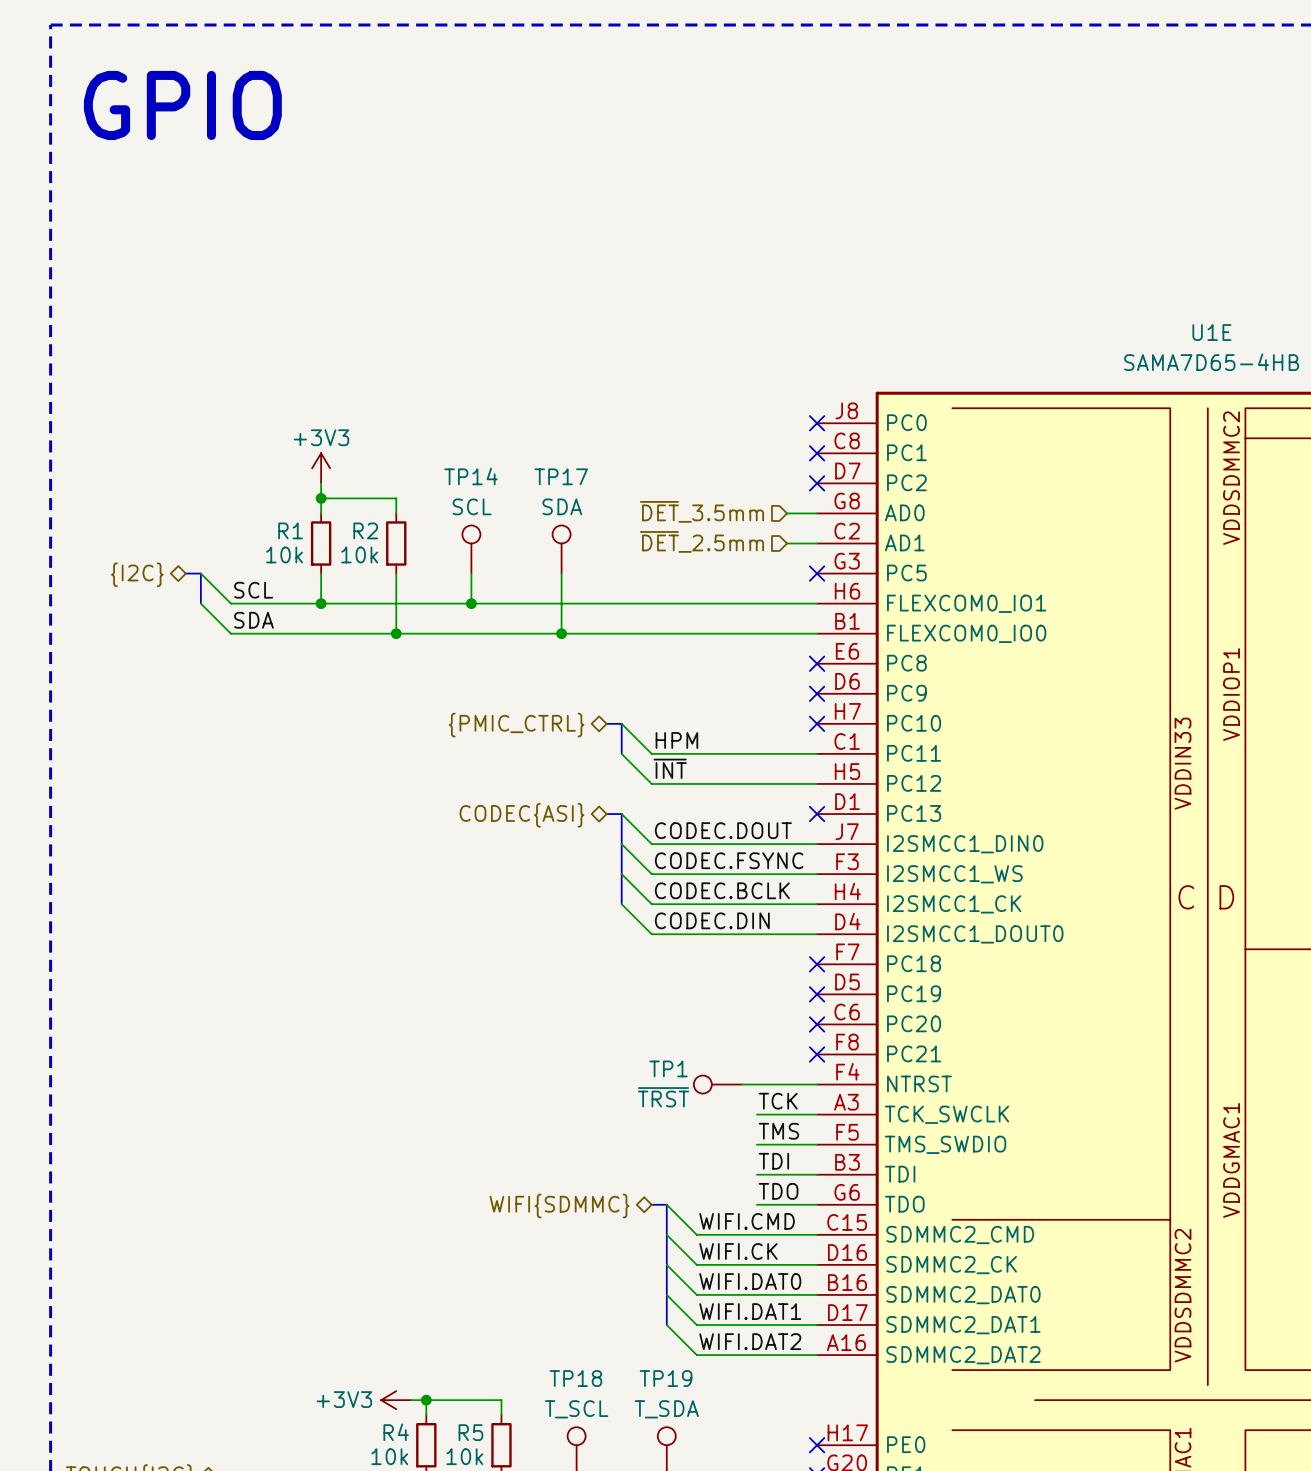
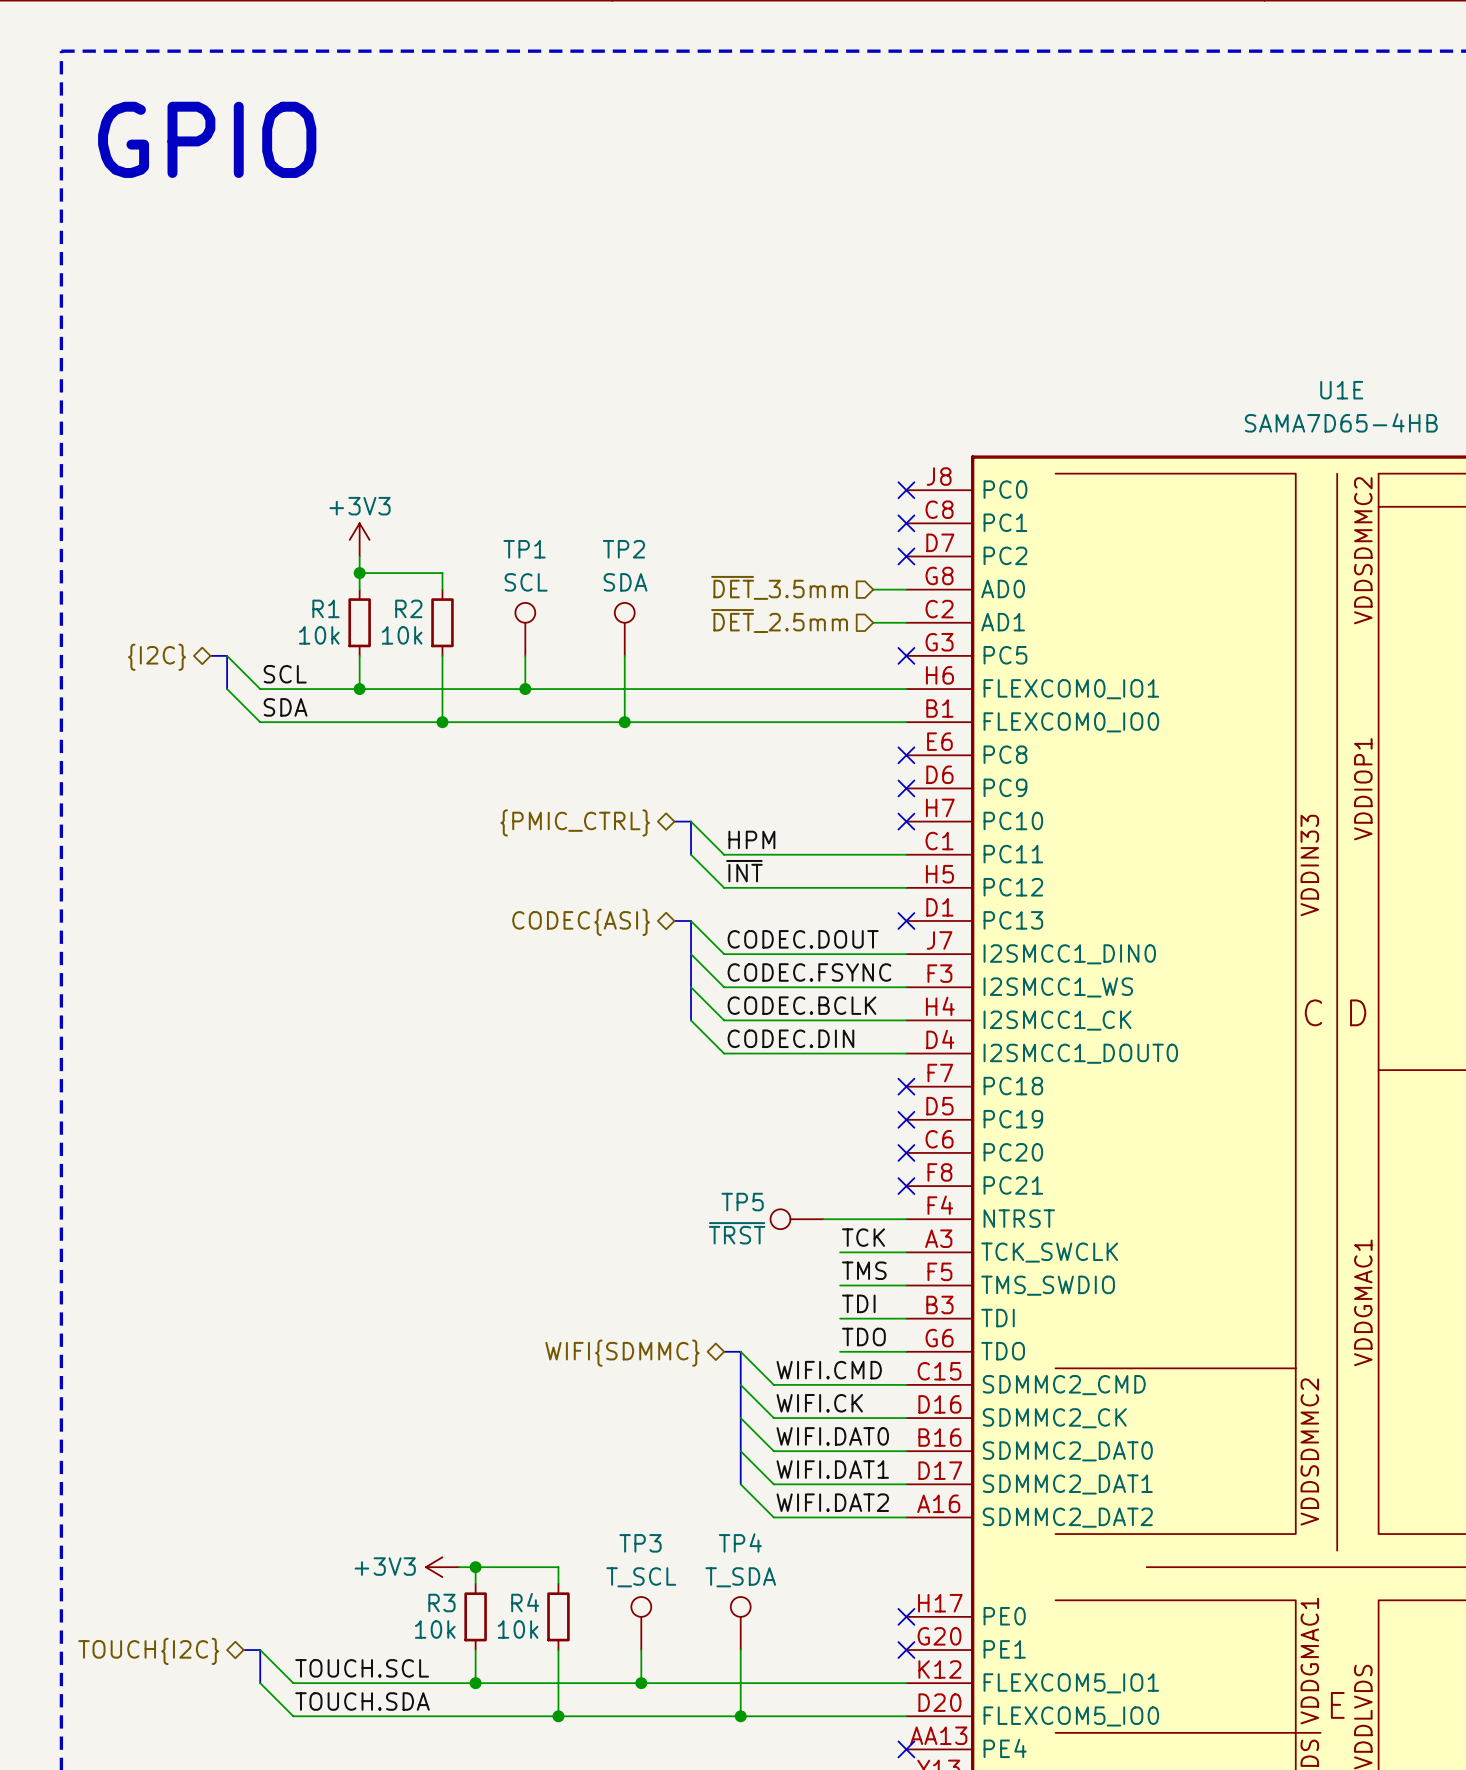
TP14 name: TP14 (471, 476) -> TP1 (524, 549)
TP17 name: TP17 (561, 476) -> TP2 (623, 549)
TP1 name: TP1 (668, 1068) -> TP5 (742, 1202)
TP18 name: TP18 (575, 1378) -> TP3 (640, 1543)
TP19 name: TP19 (666, 1378) -> TP4 (740, 1542)
R4 name: R4 (396, 1432) -> R3 (441, 1603)
R5 name: R5 (470, 1432) -> R4 (525, 1602)

